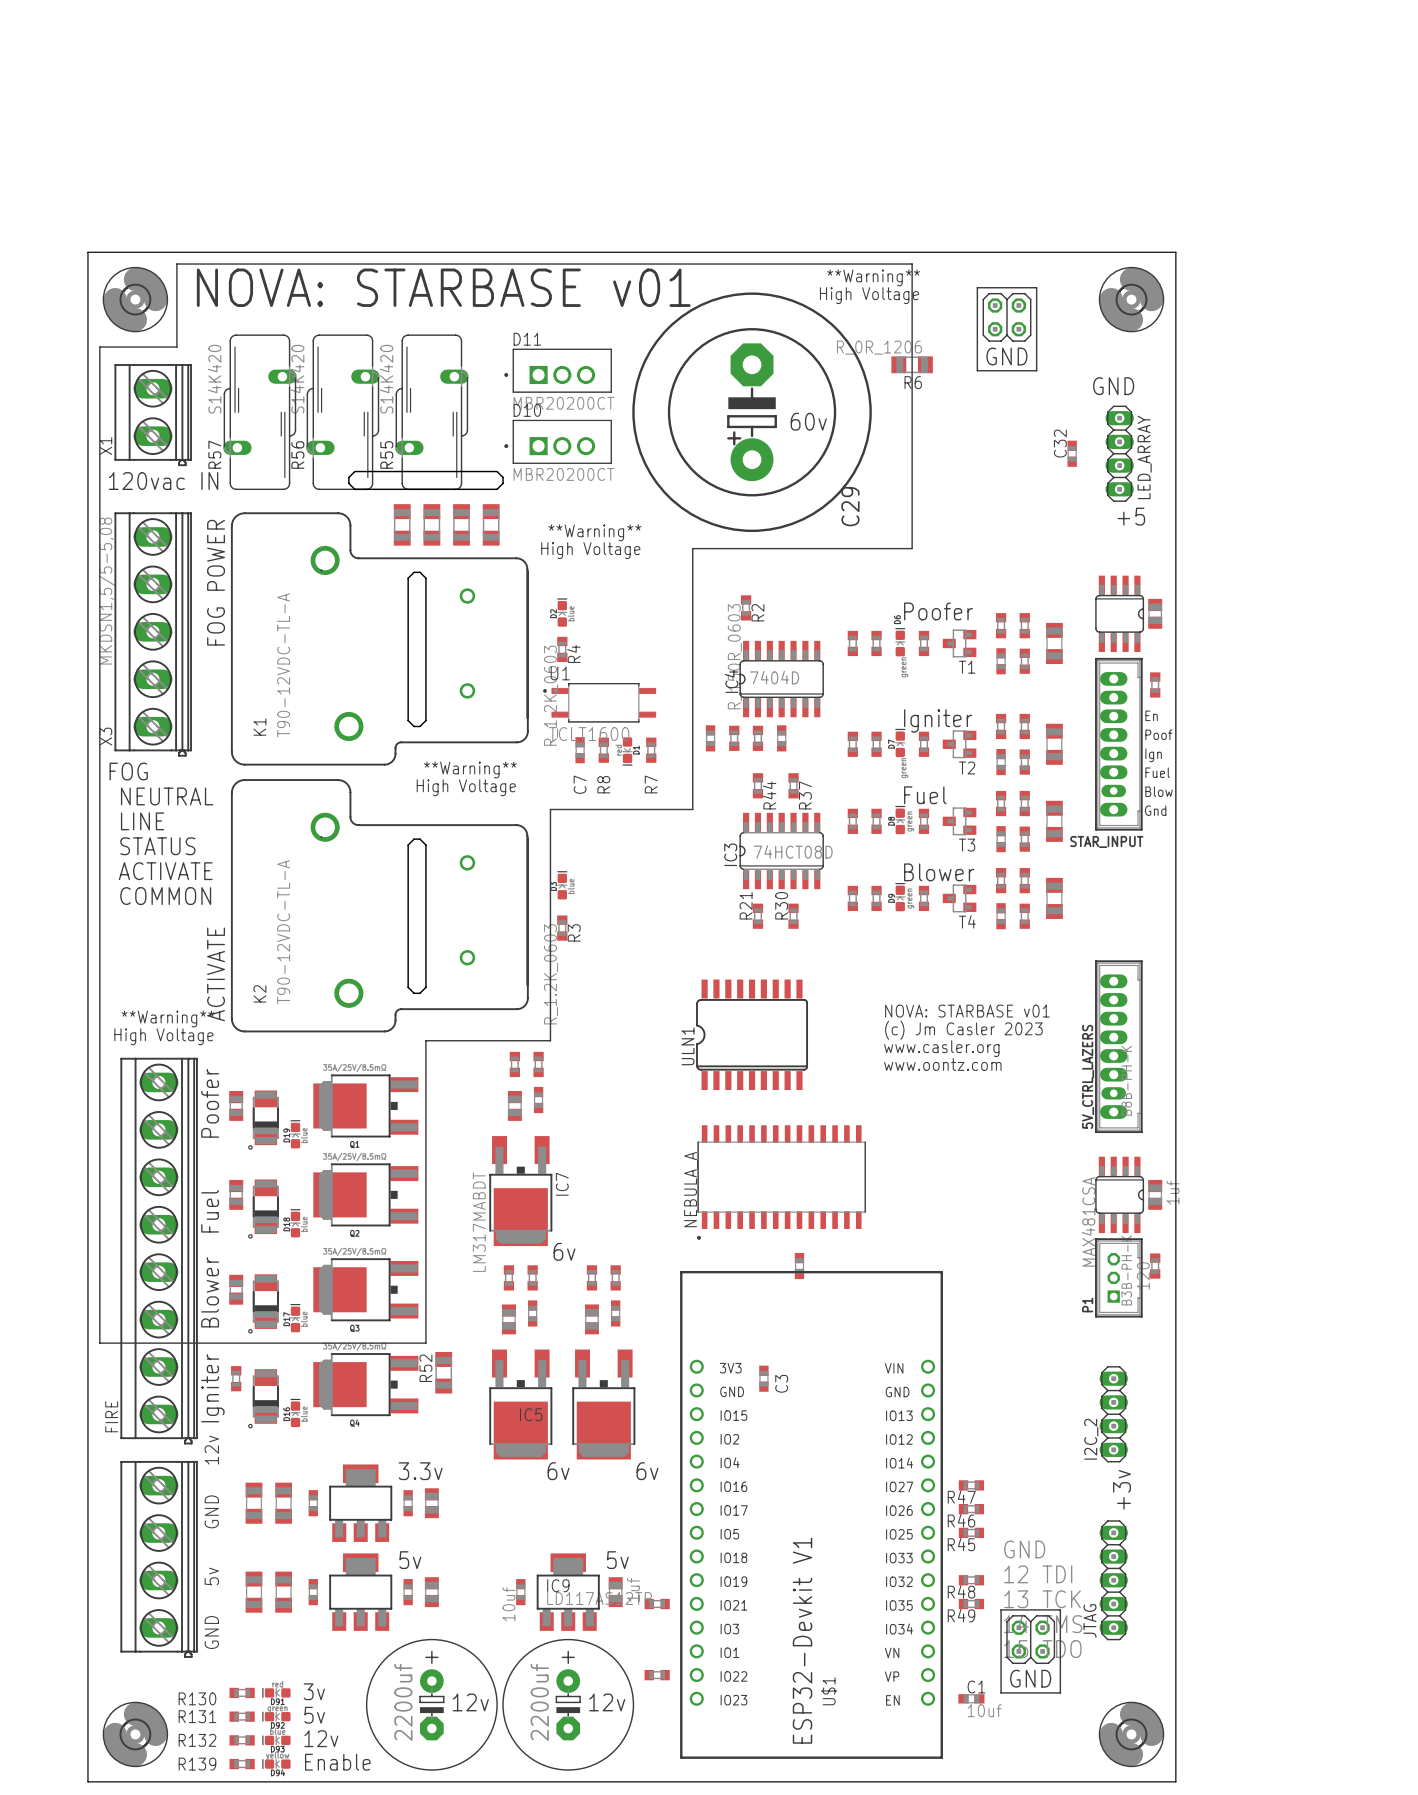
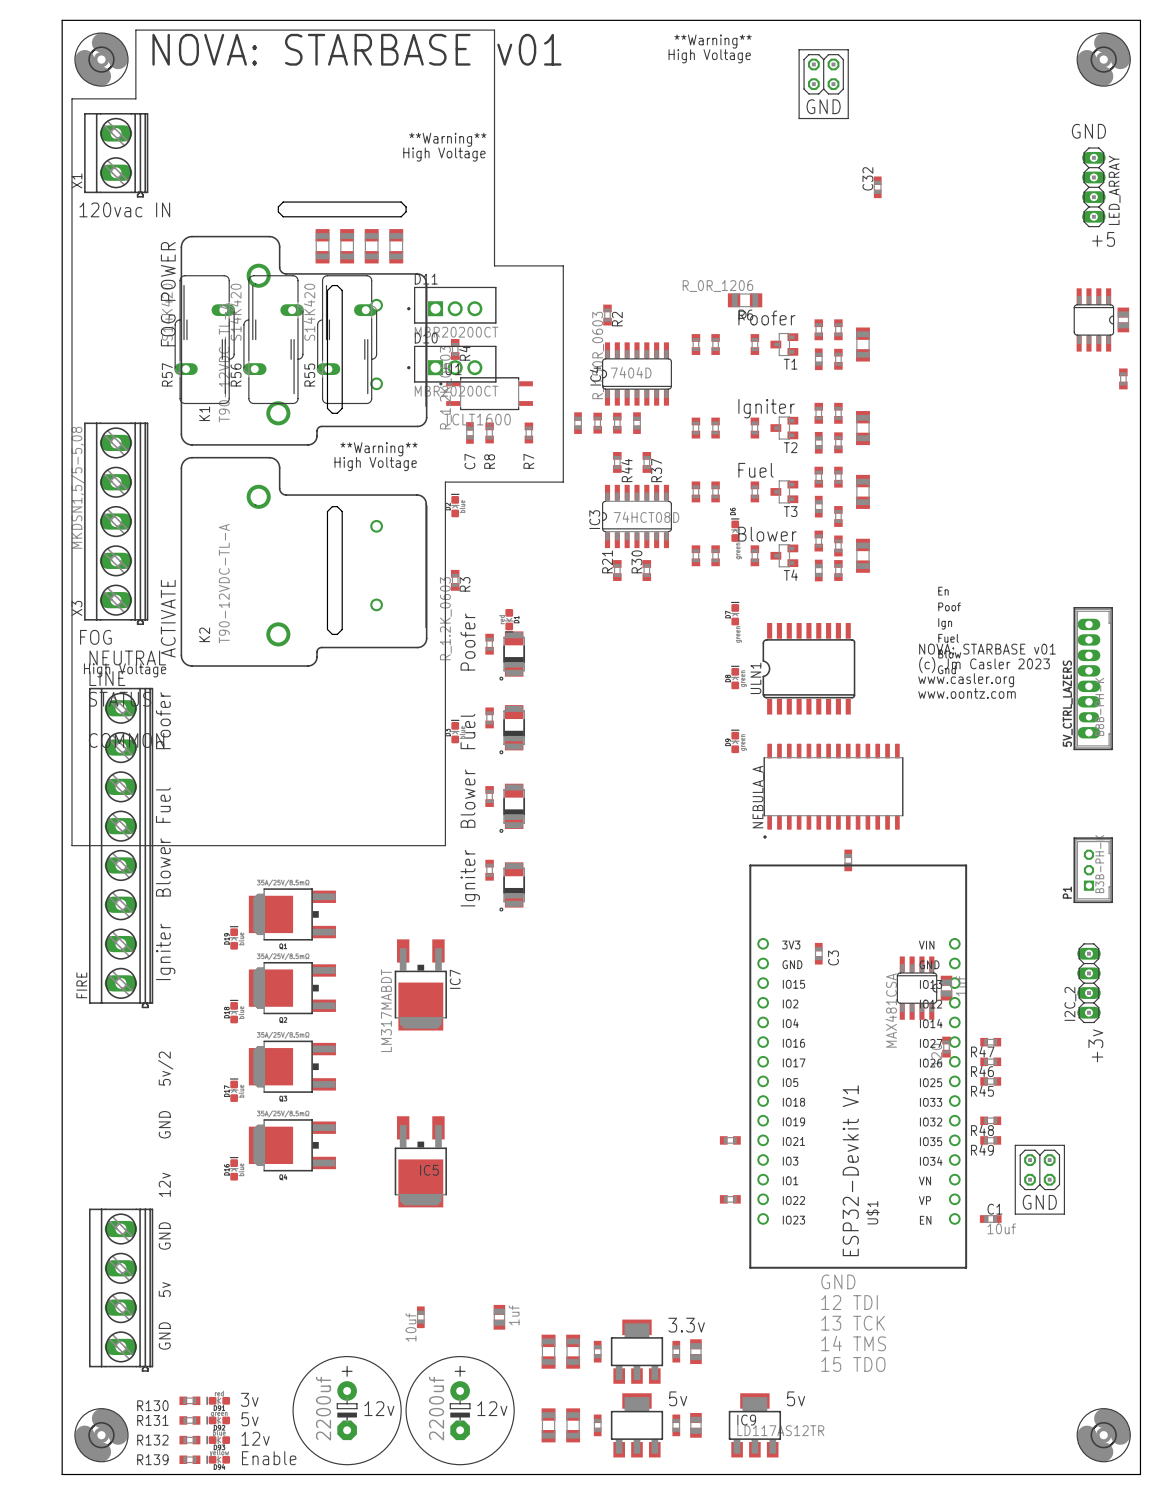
text: none -> **Warning** (713, 41)
text: none -> High Voltage (709, 56)
part: none -> (1103, 59)
text: none -> GND (823, 106)
text: none -> GND (1088, 131)
text: none -> **Warning** (447, 139)
text: none -> High Voltage (444, 154)
LED_ARRAY: none -> (1093, 187)
board edge: (87, 252) (1175, 252) (1175, 1781) -> (62, 207) (62, 20) (1140, 20) (1140, 1474) (963, 1474)
text: **Warning** (873, 277) -> none
text position: NOVA: STARBASE v01 (443, 287) -> NOVA: STARBASE v01 (356, 49)
line: (977, 287) (977, 370) (1036, 370) (1036, 287) (977, 287) -> (799, 49) (799, 118) (848, 118) (848, 49) (799, 49)
text: none -> +5 (1103, 239)
text: High Voltage (869, 295) -> none
part position: (135, 299) -> (101, 59)
part: none -> (322, 246)
part: none -> (347, 246)
part: none -> (371, 246)
part: none -> (396, 246)
part: (1131, 299) -> none
part position: (1006, 317) -> (823, 74)
line: (99, 347) (176, 347) (176, 264) (912, 264) (912, 548) (692, 548) -> (72, 285) (72, 98) (135, 98) (135, 30) (494, 30) (494, 265) (563, 265) (563, 452)
board edge: none -> (332, 285) (337, 285) (342, 290) (342, 408) (337, 413) (332, 413) (327, 408) (327, 290) (332, 285)
text: GND (1006, 356) -> none
text: none -> Poofer (766, 317)
text: GND (1113, 386) -> none
part: none -> (1093, 319)
part: none -> (1123, 319)
part: none -> (818, 329)
part: none -> (838, 329)
C29: (752, 412) -> none
X1 position: (153, 415) -> (116, 155)
part: none -> (695, 344)
part: none -> (715, 344)
part: none -> (754, 344)
part: none -> (862, 344)
text: 60v (808, 421) -> none
part: none -> (818, 359)
part: none -> (838, 359)
C32 position: (1072, 453) -> (877, 187)
LED_ARRAY: (1119, 453) -> none
part: none -> (1123, 378)
board edge: (354, 471) (348, 477) (348, 483) (354, 489) (497, 489) (503, 483) (503, 477) (497, 471) (354, 471) -> (283, 202) (278, 206) (278, 211) (283, 216) (401, 216) (406, 211) (406, 206) (401, 202) (283, 202)
text position: 120vac IN (163, 481) -> 120vac IN (124, 209)
part: none -> (818, 413)
part: none -> (838, 413)
part: none -> (578, 423)
part: none -> (597, 423)
part: none -> (617, 423)
part: none -> (636, 423)
text: +5 (1131, 516) -> none
part: none -> (695, 428)
part: none -> (715, 428)
part: none -> (754, 428)
part: none -> (862, 428)
part: (402, 524) -> none
part: (431, 524) -> none
part: (461, 524) -> none
part: (491, 524) -> none
text position: **Warning** (594, 532) -> **Warning** (379, 449)
part: none -> (818, 442)
part: none -> (838, 442)
text position: High Voltage (590, 550) -> High Voltage (375, 464)
text: none -> Fuel (756, 470)
part: none -> (818, 477)
part: none -> (838, 477)
text position: FOG POWER (216, 582) -> FOG POWER (168, 294)
line: (692, 584) (692, 809) (550, 809) -> (563, 482) (445, 482) (445, 668)
part: none -> (695, 491)
part: none -> (715, 491)
part: none -> (754, 491)
part: none -> (862, 491)
R2 position: (746, 607) -> (607, 315)
text: Poofer (938, 611) -> none
part: none -> (818, 506)
part: (1119, 613) -> none
part: (1155, 613) -> none
board edge: (408, 619) (408, 578) (414, 572) (420, 572) (425, 578) (425, 619) -> (327, 511) (332, 506) (337, 506) (342, 511)
part: (1001, 625) -> none
K1 position: (379, 638) -> (304, 340)
part: (852, 643) -> none
part: (876, 643) -> none
part: (923, 643) -> none
T1 position: (959, 643) -> (784, 344)
part: (1054, 643) -> none
text: none -> Blower (767, 534)
part footprint: [996, 648, 1006, 675] -> [814, 530, 824, 552]
R4 position: (562, 649) -> (455, 349)
part: none -> (695, 555)
part: none -> (715, 555)
part: none -> (754, 555)
part: none -> (862, 555)
IC4 position: (781, 679) -> (636, 374)
part: (1155, 684) -> none
part: none -> (838, 570)
U1 position: (599, 702) -> (486, 393)
board edge: (408, 720) (414, 726) (420, 726) (425, 720) -> (327, 595) (327, 629) (332, 634) (337, 634) (342, 629) (342, 595)
text position: Igniter (938, 720) -> Igniter (766, 408)
part: (1001, 726) -> none
part: (1024, 726) -> none
part: (710, 738) -> none
part: (734, 738) -> none
part: (757, 738) -> none
part: (781, 738) -> none
part: (852, 744) -> none
part: (876, 744) -> none
part: (923, 744) -> none
T2 position: (959, 744) -> (784, 428)
part: (1054, 744) -> none
STAR_INPUT: (1118, 744) -> none
text: none -> ACTIVATE (168, 618)
C7 position: (580, 750) -> (469, 432)
R8 position: (603, 750) -> (489, 432)
R7 position: (651, 750) -> (528, 432)
part position: (1001, 762) -> (818, 570)
part: (1024, 762) -> none
text: **Warning** (470, 769) -> none
text: none -> Poofer (467, 642)
part: none -> (489, 644)
R44 position: (757, 785) -> (617, 462)
R37 position: (793, 785) -> (646, 462)
text: none -> NOVA: STARBASE v01 (987, 649)
text: High Voltage (466, 787) -> none
part: none -> (512, 655)
text: Fuel (925, 795) -> none
part: (1001, 803) -> none
part: (1024, 803) -> none
text: none -> (c) Jm Casler 2023 (984, 665)
text: none -> High Voltage (125, 670)
part: (852, 821) -> none
part: (876, 821) -> none
part: (923, 821) -> none
T3 position: (959, 821) -> (784, 491)
part: (1054, 821) -> none
text: none -> www.casler.org (966, 680)
board edge: (414, 839) (420, 839) (425, 845) (425, 987) (420, 993) (414, 993) (408, 987) (408, 845) (414, 839) -> none
part: (1001, 839) -> none
part: (1024, 839) -> none
text: none -> www.oontz.com (967, 693)
IC3 position: (781, 851) -> (636, 516)
part: none -> (489, 717)
text: ACTIVATE (165, 871) -> none
text: Blower (939, 872) -> none
part: (1001, 880) -> none
part: (1024, 880) -> none
part: none -> (512, 729)
text: none -> Fuel (467, 731)
part: (852, 898) -> none
part: (876, 898) -> none
part: (923, 898) -> none
T4 position: (959, 898) -> (784, 555)
part: (1054, 898) -> none
K2 position: (379, 905) -> (304, 561)
R21 position: (757, 916) -> (617, 570)
R30 position: (793, 916) -> (646, 570)
part: (1001, 916) -> none
part: (1024, 916) -> none
R3 position: (562, 928) -> (455, 580)
NEBULA_A: none -> (833, 791)
part: none -> (489, 796)
text: none -> Blower (467, 798)
text: none -> Fuel (163, 805)
text: ACTIVATE (216, 974) -> none
part: none -> (512, 808)
text: NOVA: STARBASE v01 (967, 1011) -> none
text: **Warning** (167, 1018) -> none
line: (99, 1022) (99, 1343) (425, 1343) (425, 1040) (550, 1040) (550, 1022) -> (72, 845) (445, 845)
text: (c) Jm Casler 2023 (963, 1030) -> none
ULN1 position: (752, 1034) -> (808, 668)
text: High Voltage (163, 1036) -> none
part: none -> (848, 860)
5V_CTRL_LAZERS position: (1118, 1046) -> (1093, 678)
text: www.casler.org (941, 1048) -> none
text: none -> Blower (163, 867)
part: none -> (489, 870)
text: none -> Igniter (470, 878)
part: (514, 1064) -> none
part: (538, 1064) -> none
text: www.oontz.com (942, 1064) -> none
part: none -> (512, 886)
part: (538, 1100) -> none
text position: Poofer (210, 1103) -> Poofer (163, 720)
part: (236, 1105) -> none
part: (514, 1105) -> none
part: (263, 1120) -> none
text: none -> Igniter (165, 951)
NEBULA_A: (781, 1182) -> none
part: (236, 1194) -> none
part: (263, 1209) -> none
text: Fuel (210, 1211) -> none
FIRE position: (159, 1251) -> (121, 848)
text: 6v (564, 1251) -> none
text: none -> +3v (1095, 1045)
part: (799, 1266) -> none
part: (508, 1277) -> none
part: (532, 1277) -> none
part: (591, 1277) -> none
part: (615, 1277) -> none
P1 position: (1118, 1277) -> (1093, 870)
part: (236, 1289) -> none
text: Blower (210, 1292) -> none
part: (263, 1303) -> none
part: (532, 1313) -> none
part: (615, 1313) -> none
part: (508, 1319) -> none
part: (591, 1319) -> none
text: none -> GND 5v/2 (165, 1095)
R52: (443, 1372) -> none
part: (236, 1378) -> none
C3 position: (763, 1378) -> (818, 953)
part: none -> (730, 1140)
line: none -> (1015, 1145) (1015, 1214) (1064, 1214) (1064, 1145) (1015, 1145)
text: Igniter (212, 1388) -> none
part: (263, 1398) -> none
part: (603, 1404) -> none
I2C_2 position: (1113, 1414) -> (1088, 983)
part: none -> (1039, 1169)
part: none -> (730, 1199)
text: none -> GND (1039, 1202)
text: 3.3v (420, 1471) -> none
text: 6v (558, 1471) -> none
text: 6v (647, 1471) -> none
R47 position: (971, 1485) -> (990, 1042)
text: +3v (1122, 1489) -> none
part: (253, 1503) -> none
part: (283, 1503) -> none
part: (313, 1503) -> none
part: (360, 1503) -> none
part: (408, 1503) -> none
part: (431, 1503) -> none
R46 position: (971, 1509) -> (990, 1061)
U$1 position: (811, 1514) -> (858, 1066)
R45 position: (971, 1532) -> (990, 1081)
text position: GND 5v GND 12v (211, 1542) -> GND 5v GND 12v (164, 1261)
text: 5v (410, 1560) -> none
text: 5v (617, 1560) -> none
R48 position: (971, 1580) -> (990, 1120)
JTAG: (1113, 1580) -> none
part: (253, 1592) -> none
part: (283, 1592) -> none
part: (313, 1592) -> none
part: (360, 1592) -> none
part: (408, 1592) -> none
part: (431, 1592) -> none
IC9 position: (568, 1592) -> (754, 1425)
text: none -> 3.3v (686, 1325)
part: (657, 1604) -> none
R49 position: (971, 1604) -> (990, 1140)
line: (1001, 1609) (1001, 1692) (1060, 1692) (1060, 1609) (1001, 1609) -> none
part: none -> (548, 1351)
part: none -> (573, 1351)
part: none -> (597, 1351)
part: none -> (636, 1351)
part: none -> (676, 1351)
part: none -> (695, 1351)
part: (1030, 1639) -> none
part: (657, 1675) -> none
text: GND (1030, 1678) -> none
text: none -> 5v (678, 1398)
text: none -> 5v (796, 1398)
C1 position: (971, 1698) -> (990, 1219)
part: none -> (548, 1425)
part: none -> (573, 1425)
part: none -> (597, 1425)
part: none -> (636, 1425)
part: none -> (676, 1425)
part: none -> (695, 1425)
part position: (1131, 1734) -> (1103, 1435)

